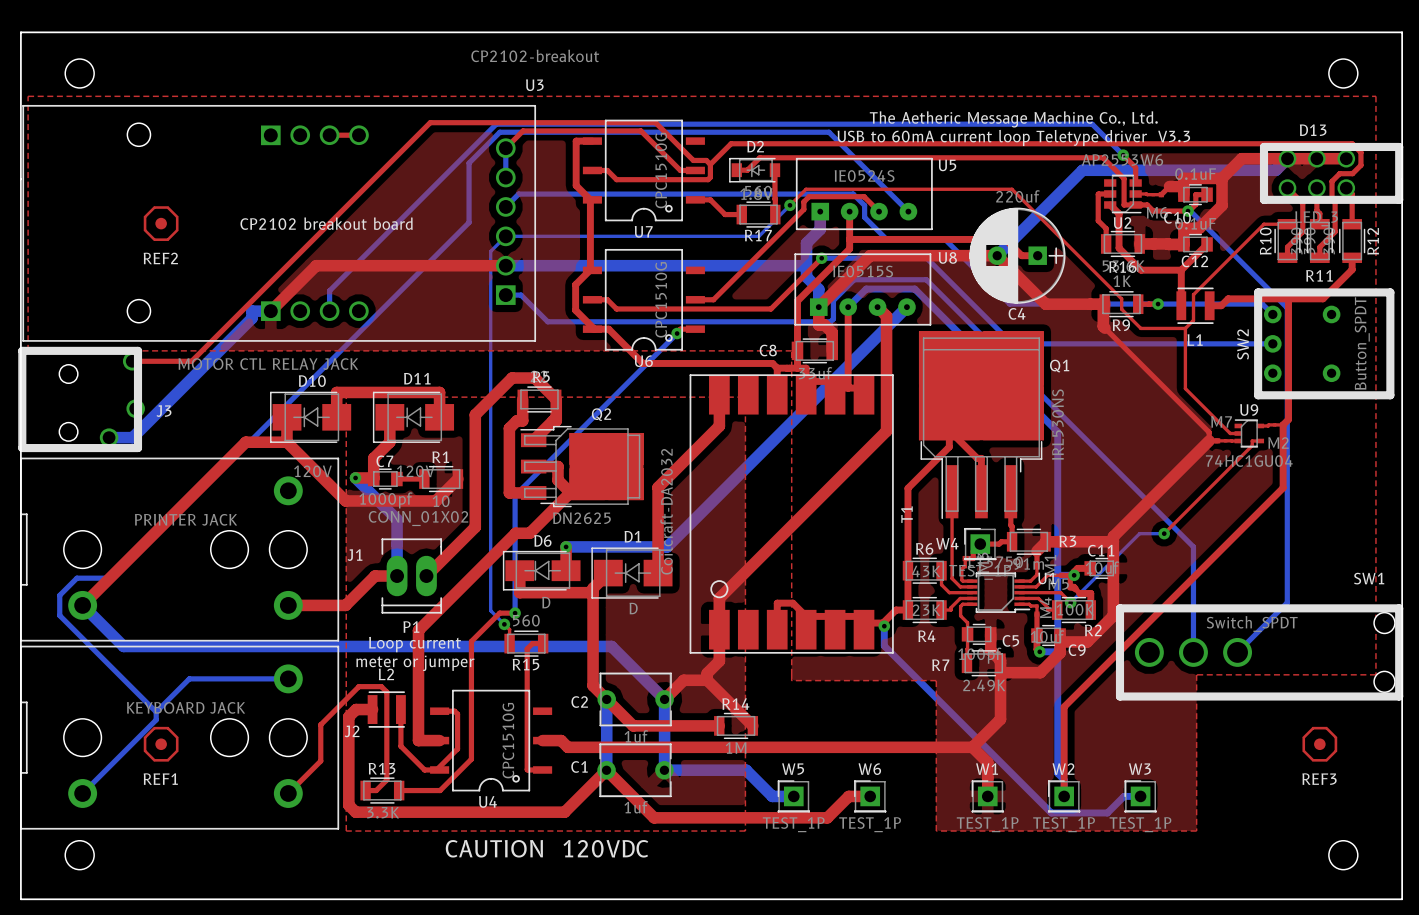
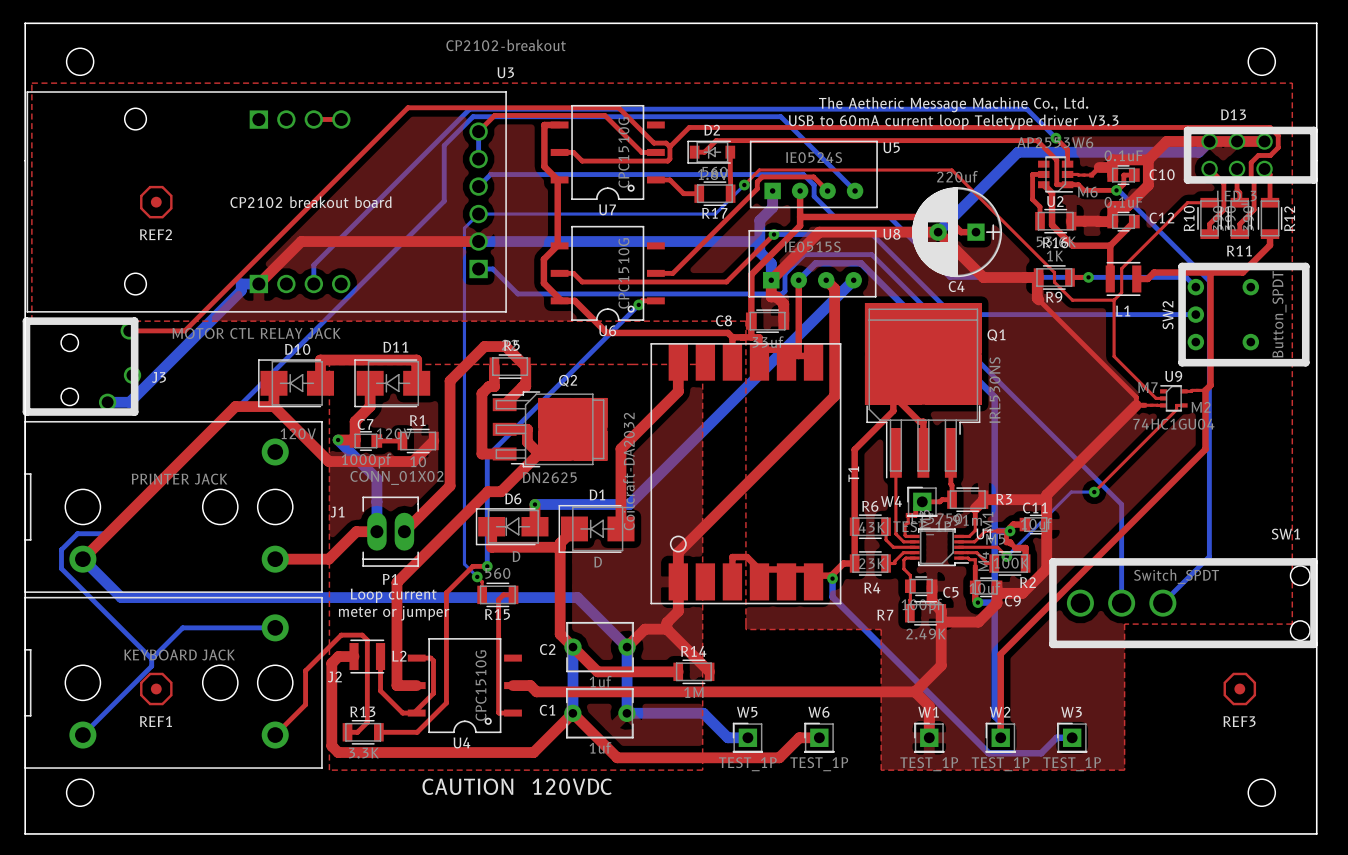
C10 name position: C10 (1177, 217) -> C10 (1162, 174)
C12 name position: C12 (1194, 261) -> C12 (1161, 218)
L2 name position: L2 (386, 674) -> L2 (399, 656)

